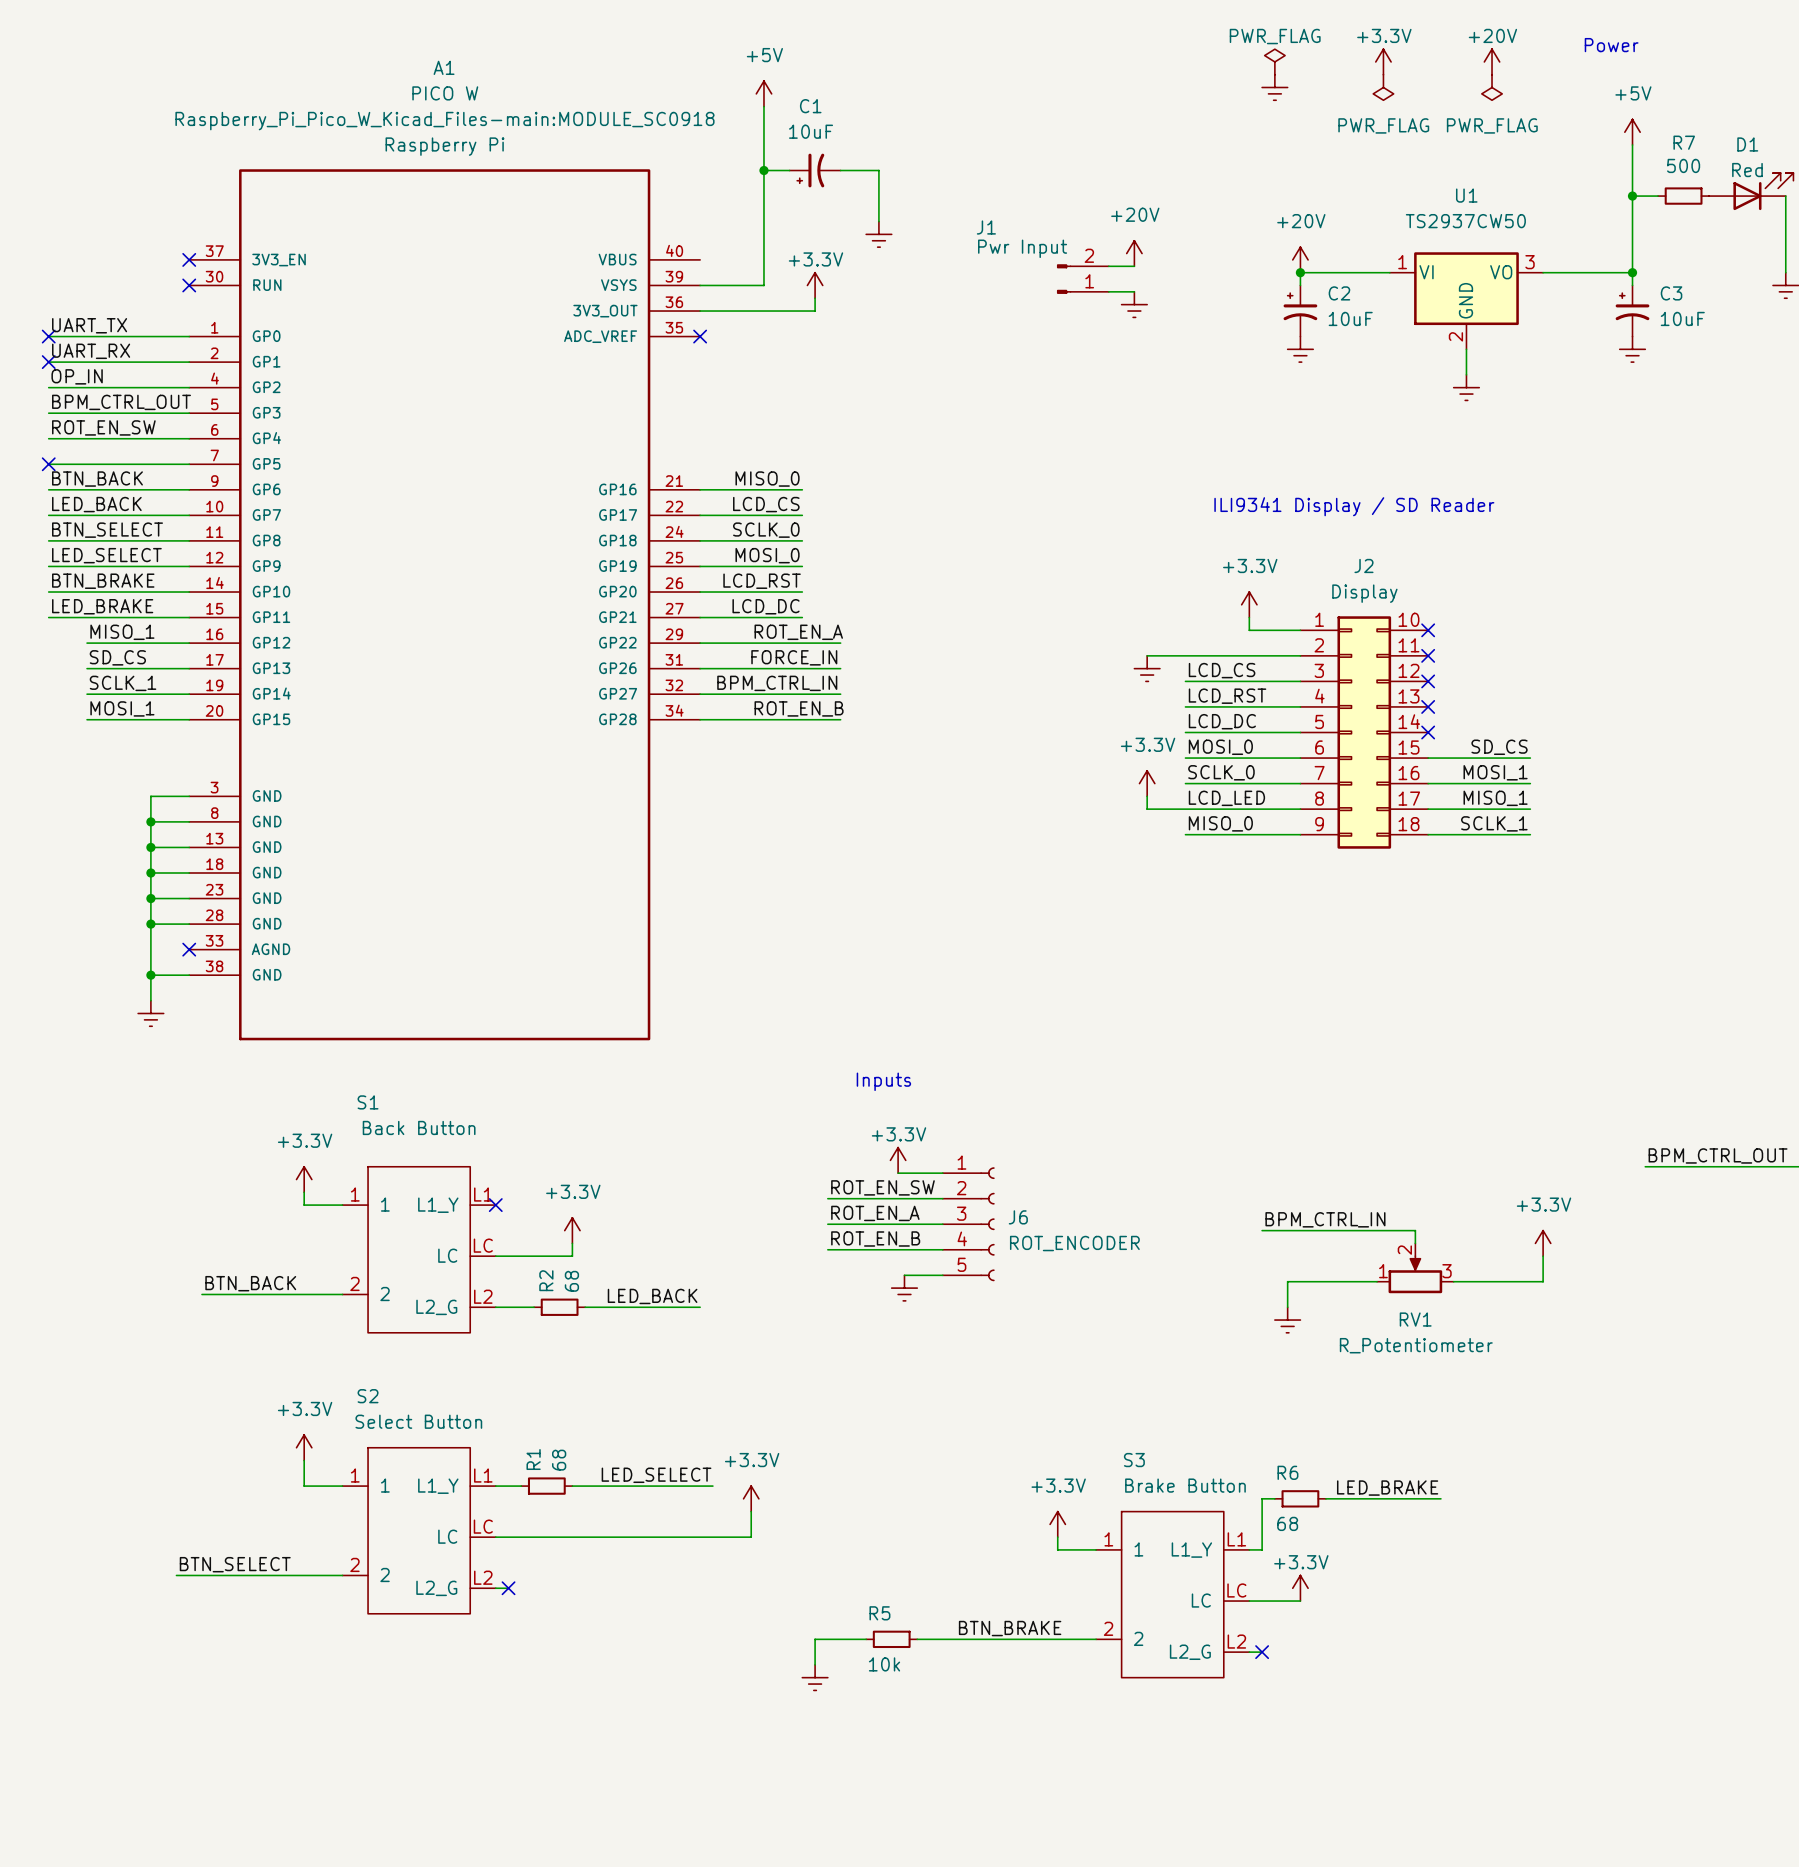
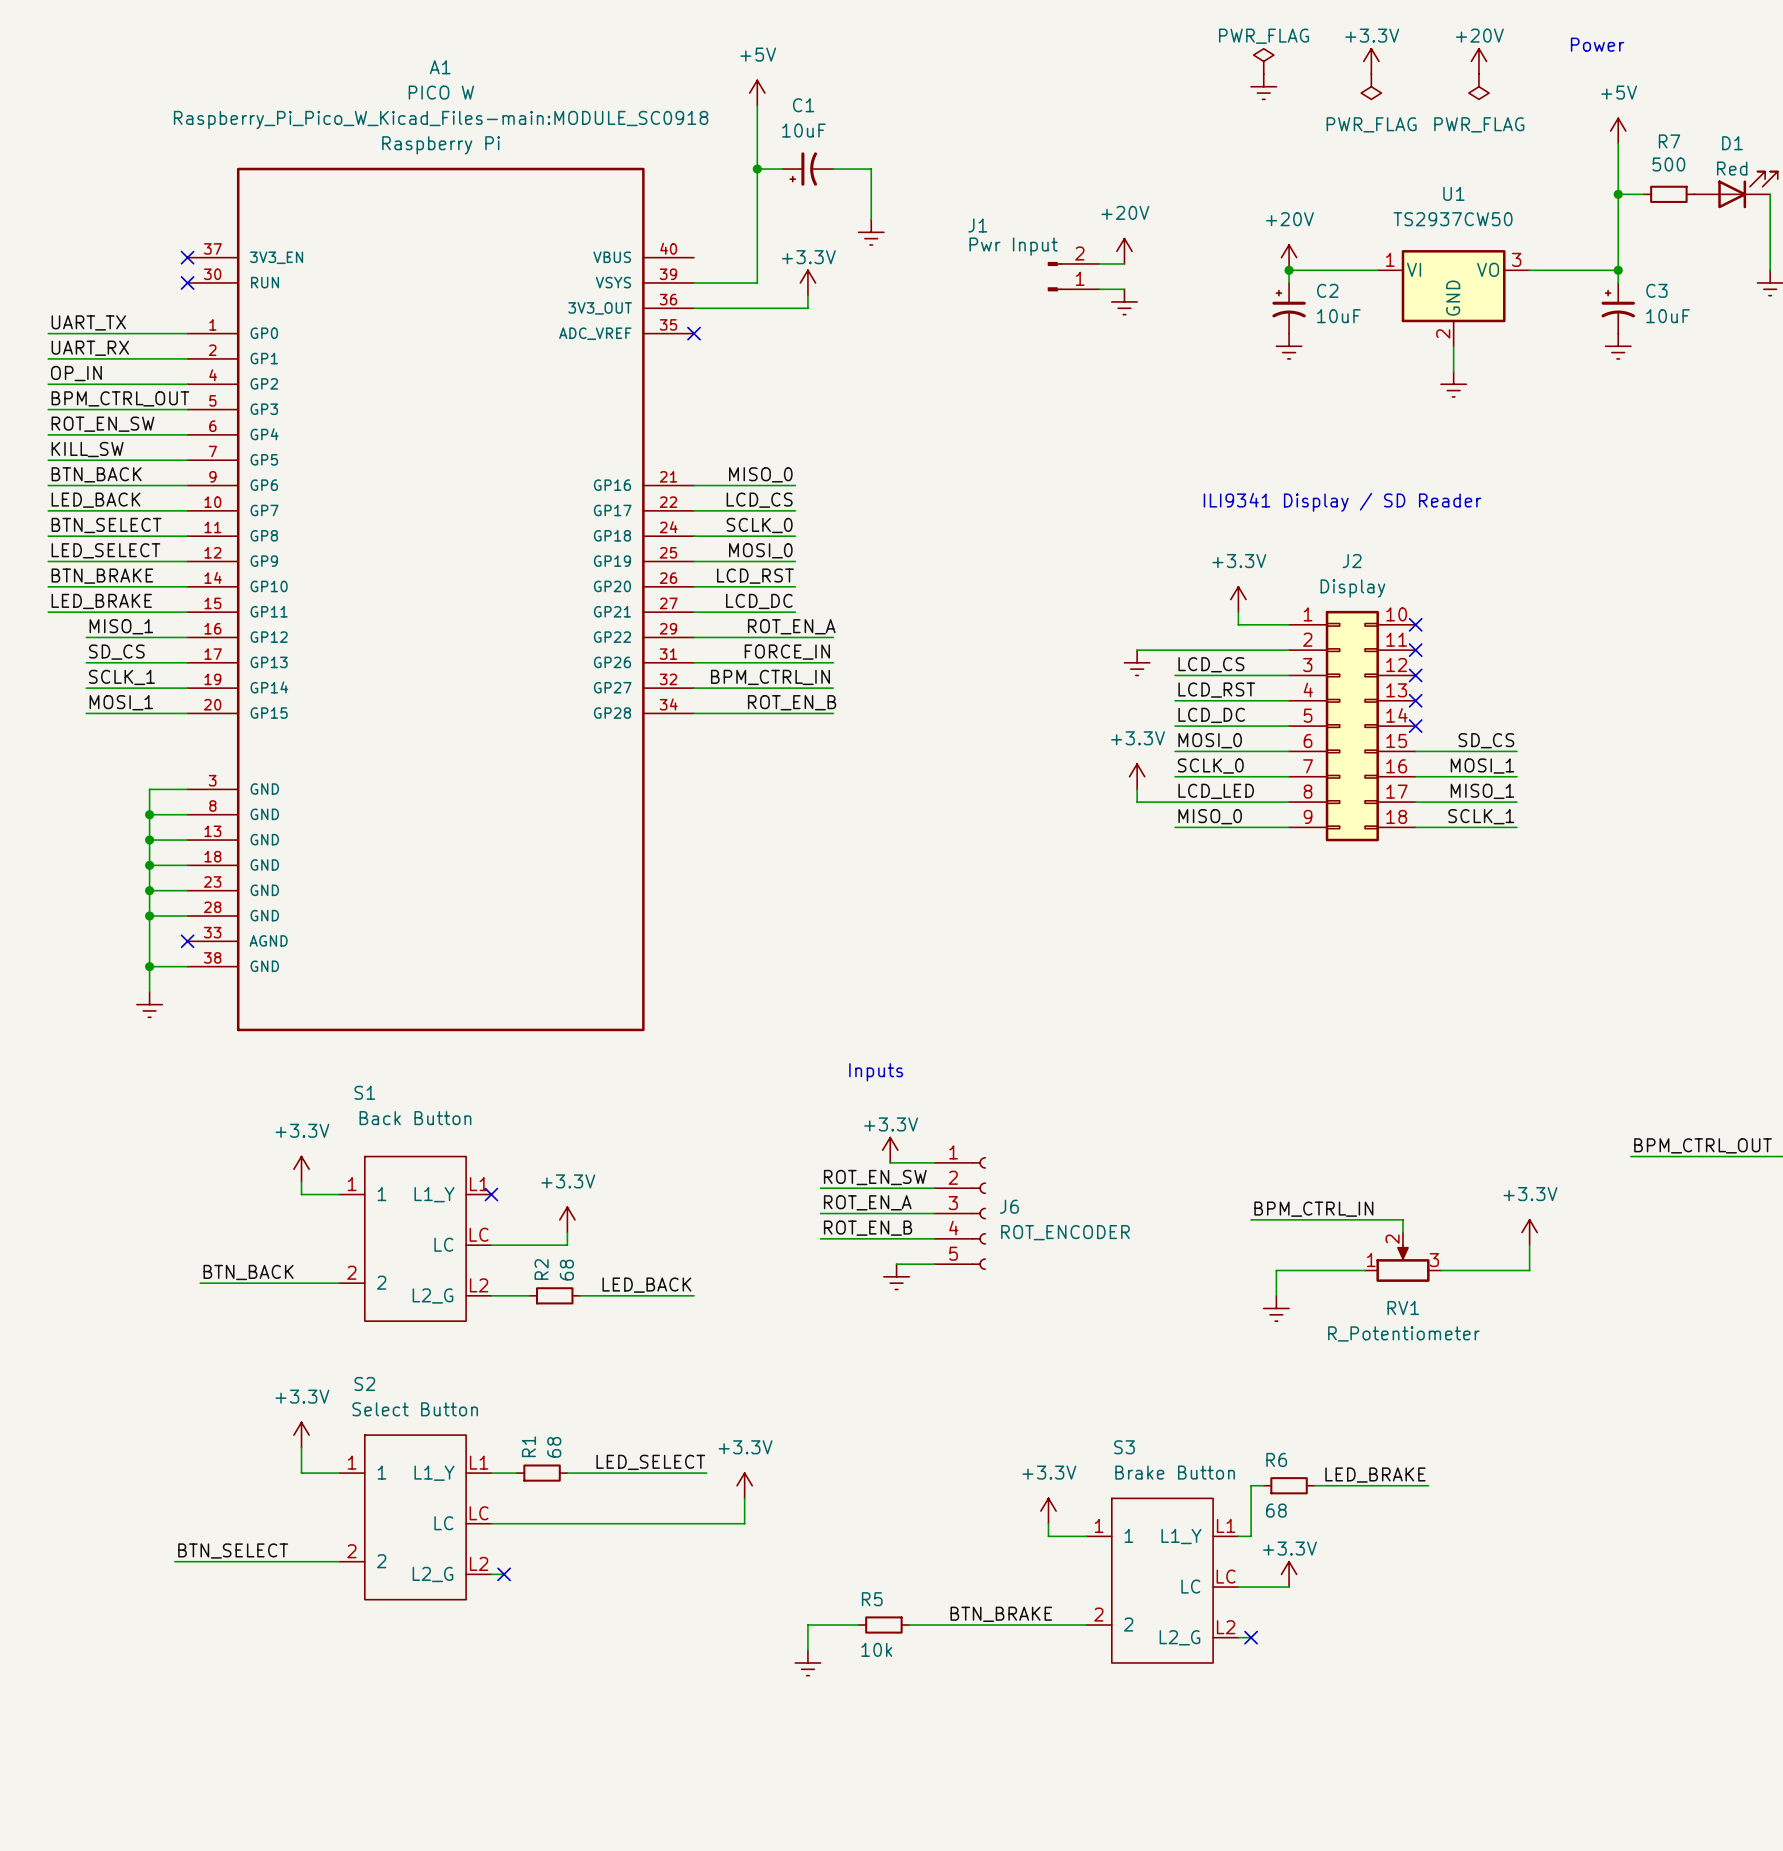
no-connect mark: (48, 336) -> none
no-connect mark: (48, 362) -> none
label: none -> KILL_SW (87, 449)
no-connect mark: (48, 464) -> none

